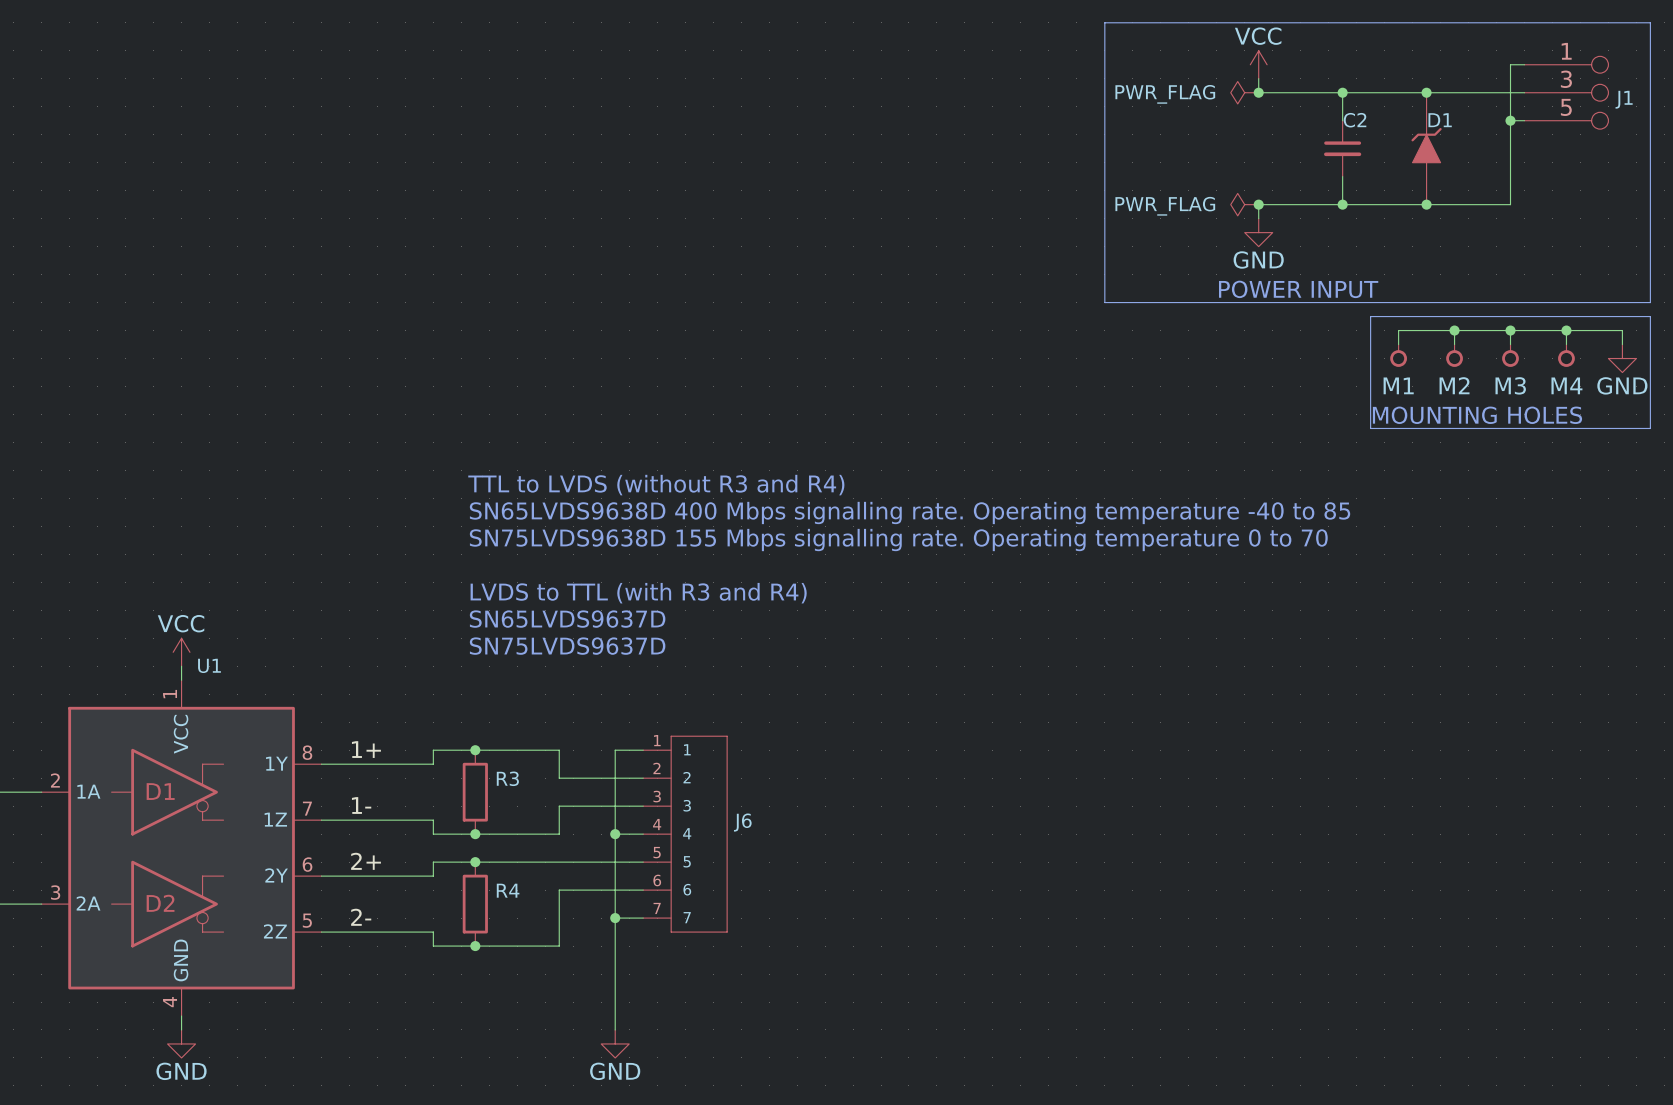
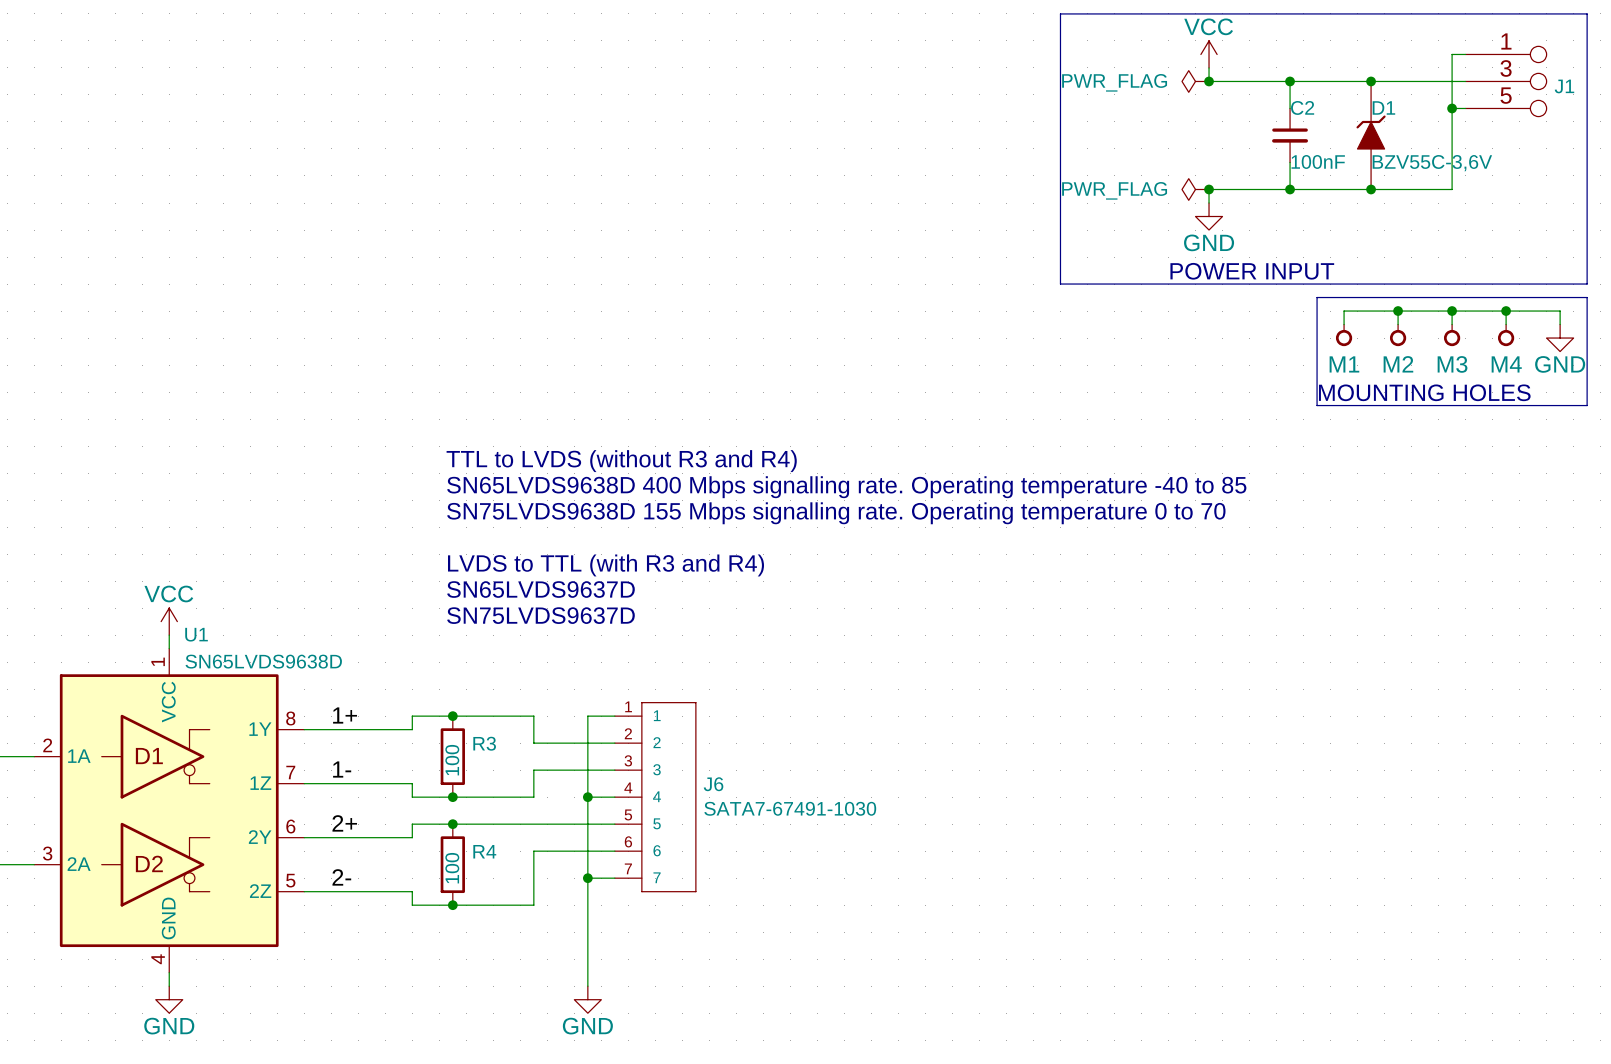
C2 value: none -> 100nF (1318, 161)
D1 value: none -> BZV55C-3,6V (1432, 163)
U1 value: none -> SN65LVDS9638D (263, 661)
R3 value: none -> 100 (452, 760)
J6 value: none -> SATA7-67491-1030 (790, 808)
R4 value: none -> 100 (452, 868)

